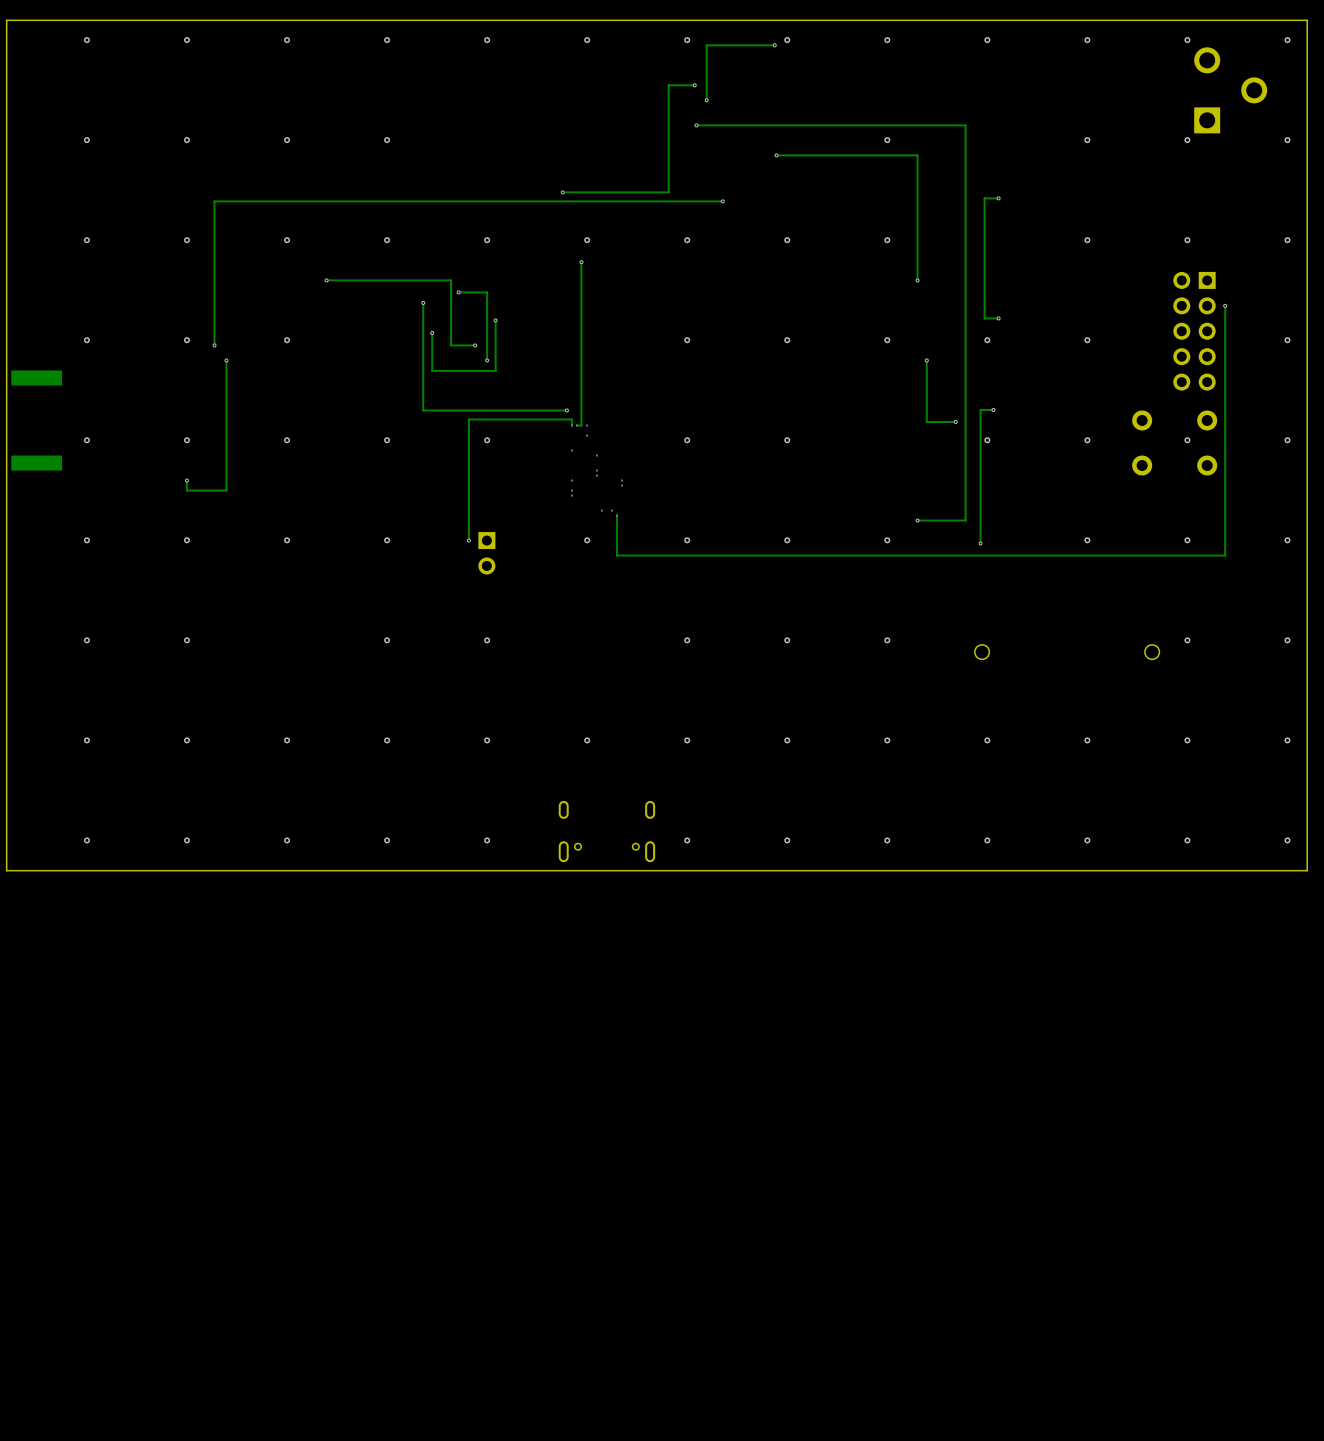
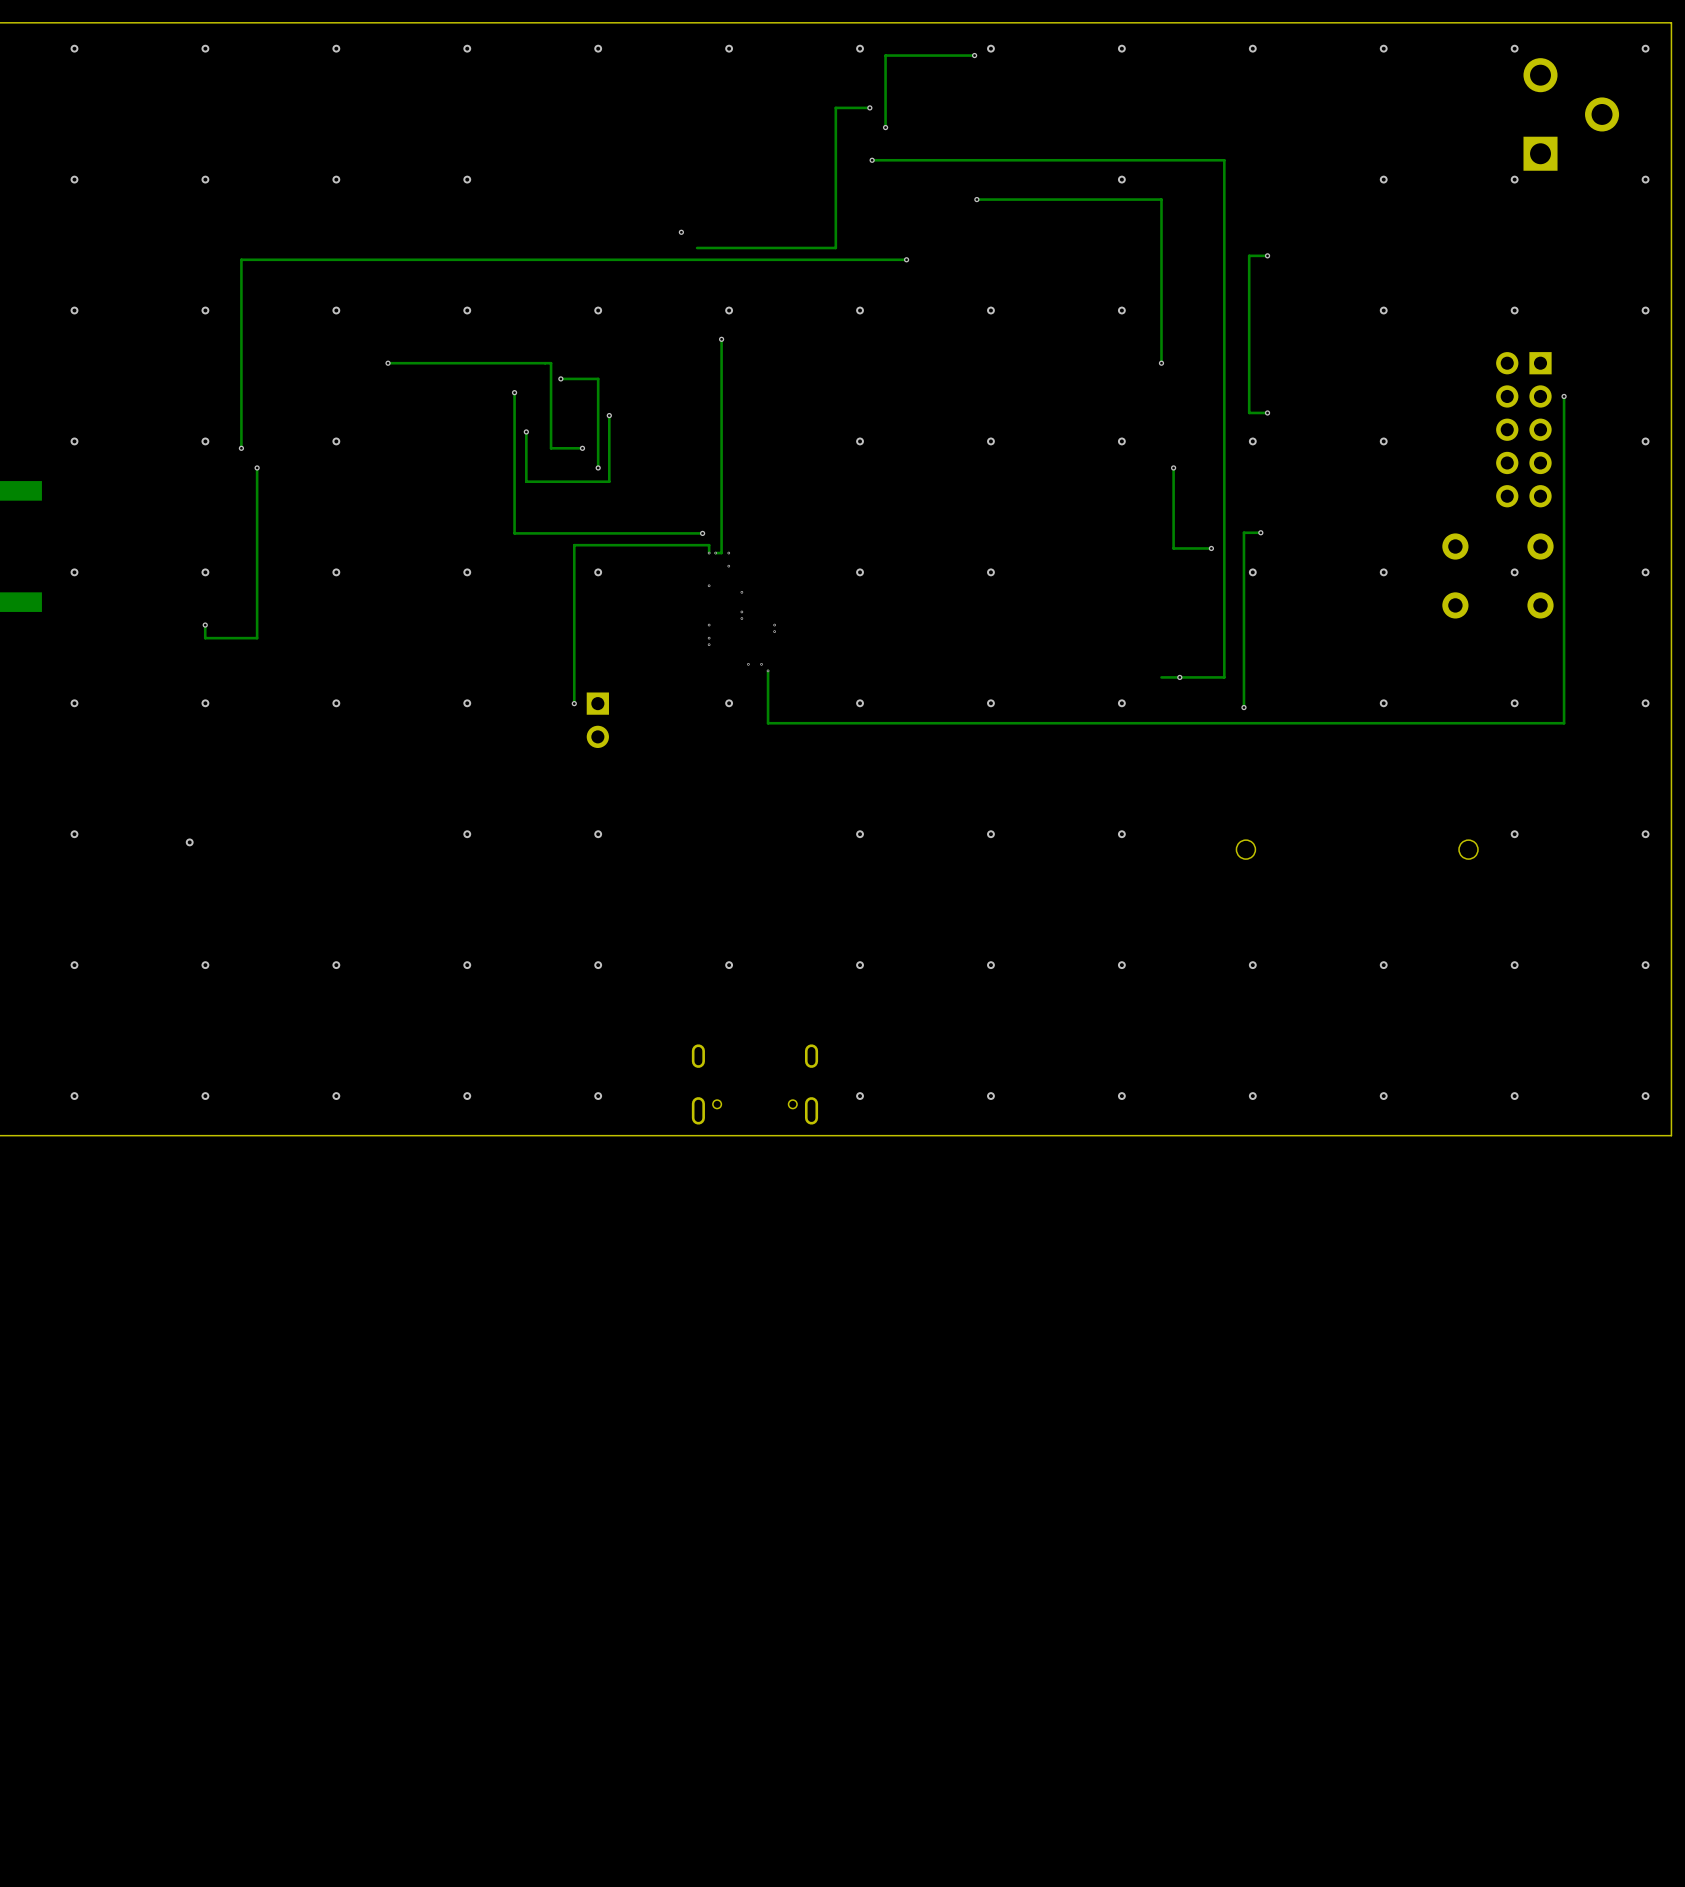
via position: (562, 192) -> (681, 232)
via position: (917, 520) -> (1179, 677)
via position: (186, 640) -> (189, 842)

